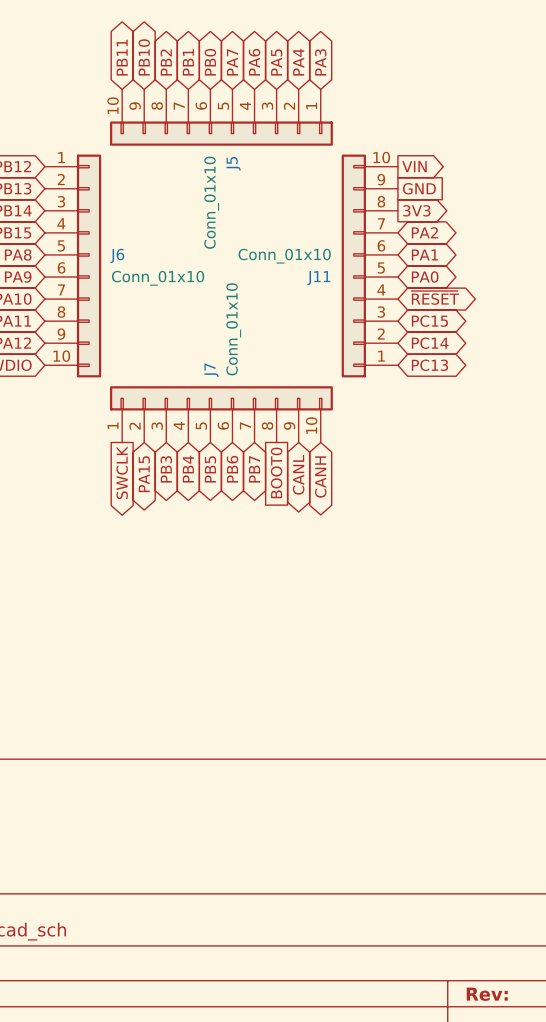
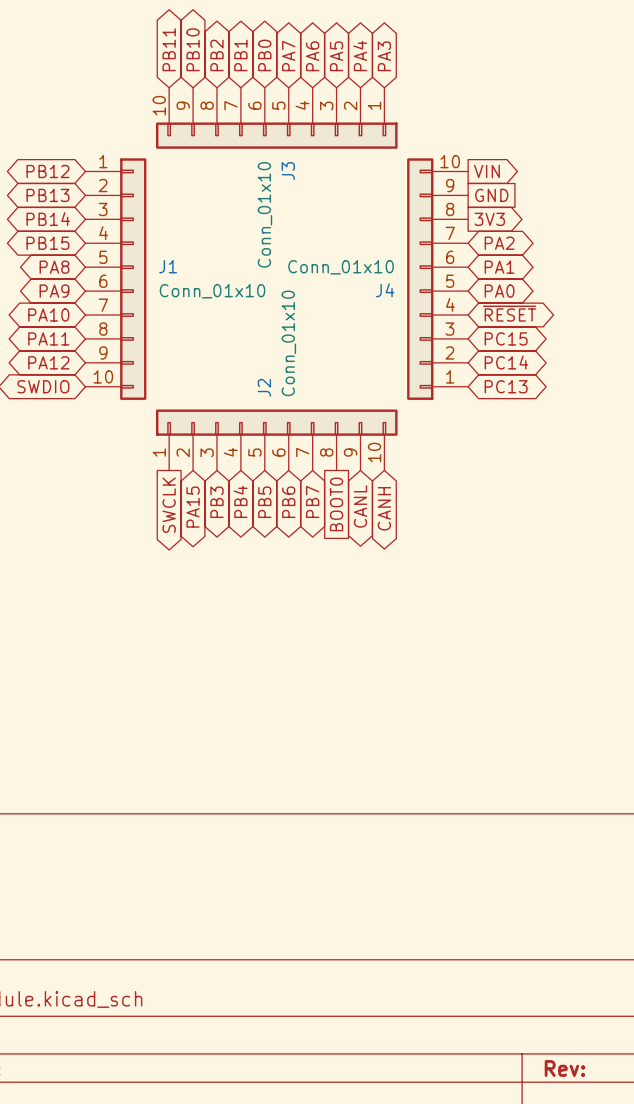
J5 name: J5 (233, 163) -> J3 (288, 171)
J6 name: J6 (117, 255) -> J1 (168, 266)
J11 name: J11 (318, 278) -> J4 (385, 290)
J7 name: J7 (211, 370) -> J2 (264, 387)

